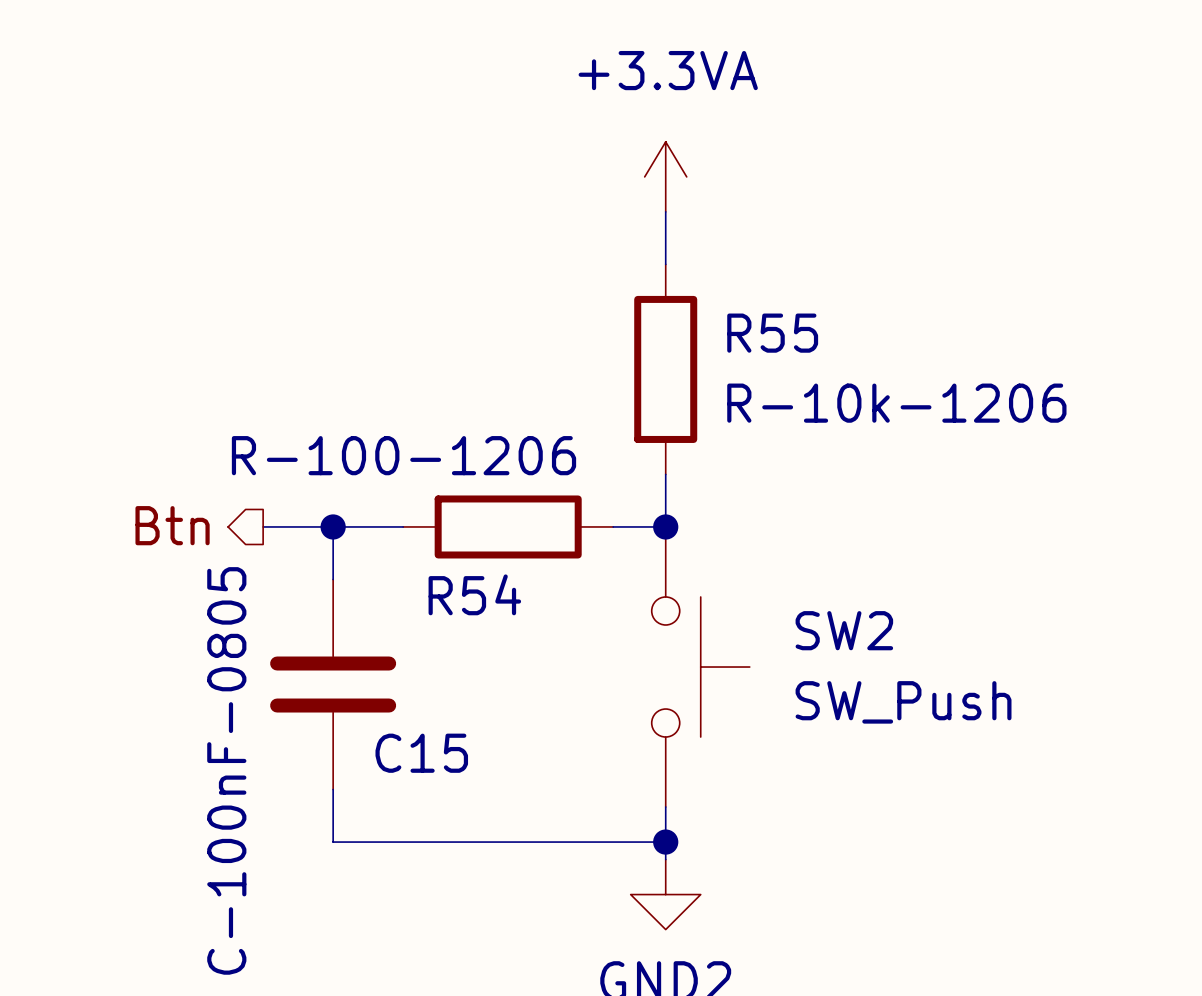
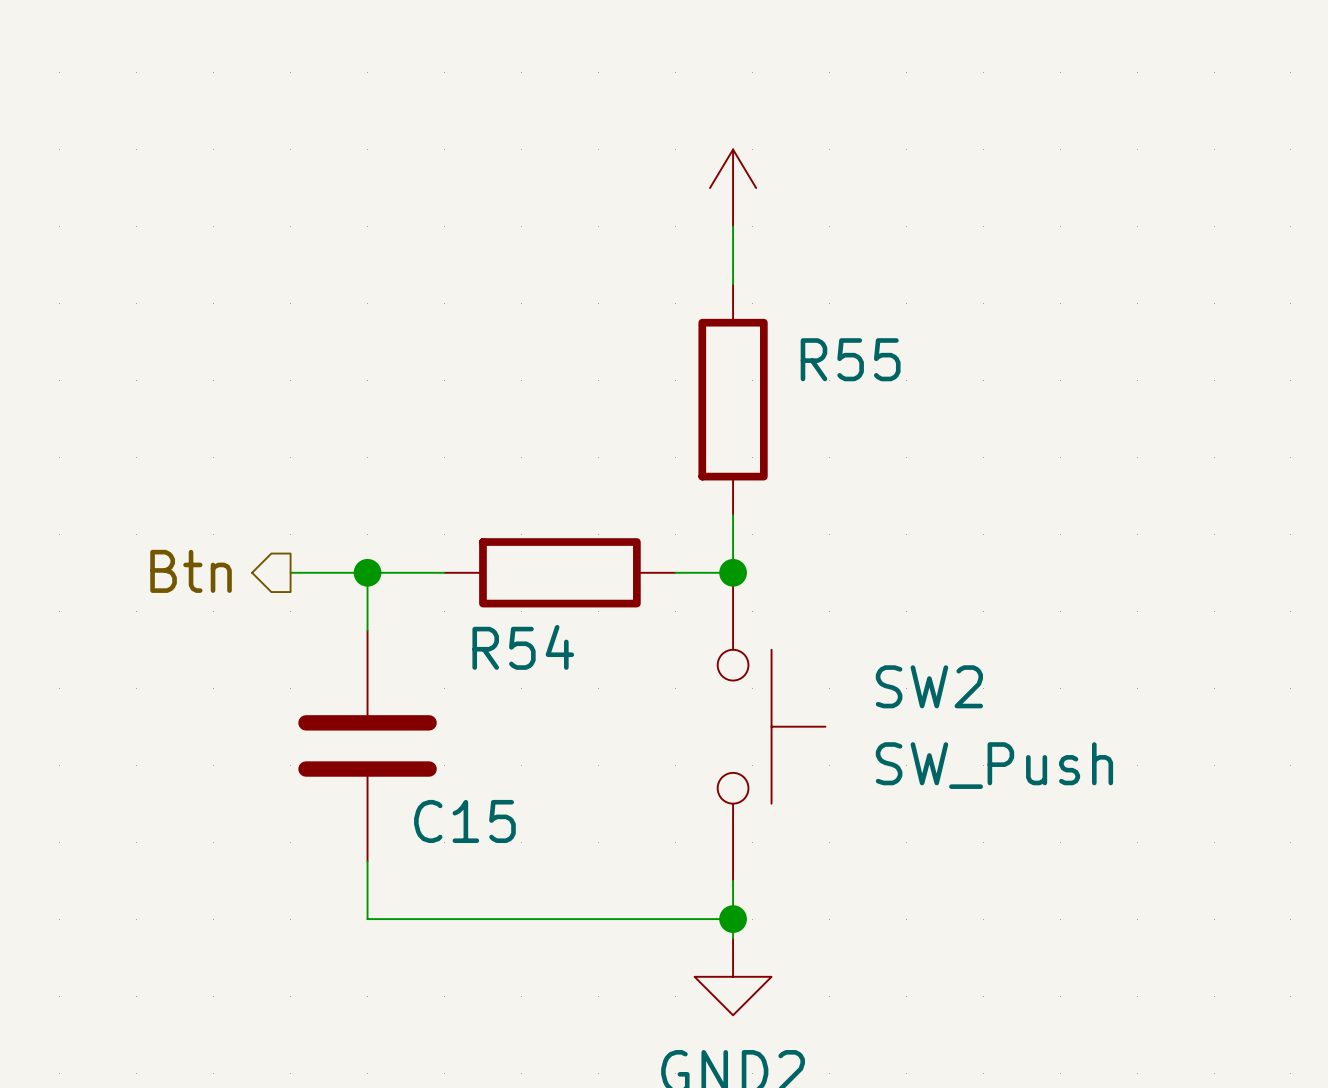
power symbol text: +3.3VA (668, 70) -> none
R55 value: R-10k-1206 (896, 403) -> none
R54 value: R-100-1206 (403, 455) -> none
C15 value: C-100nF-0805 (226, 770) -> none

